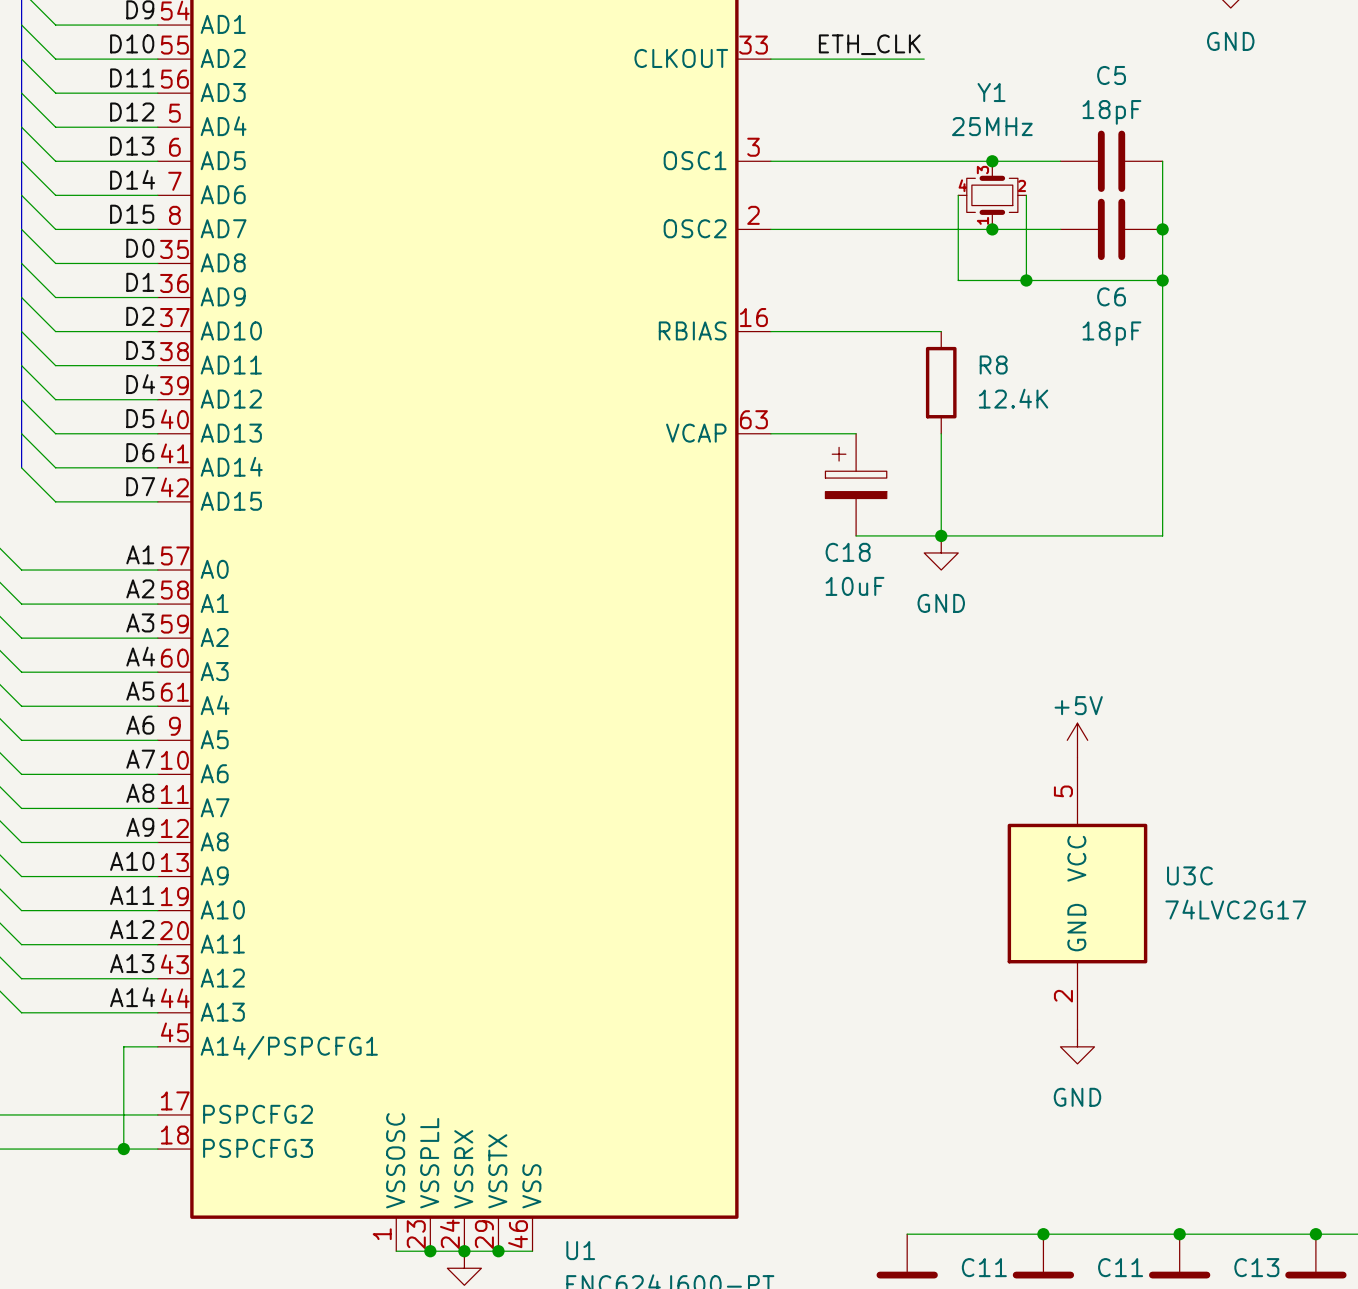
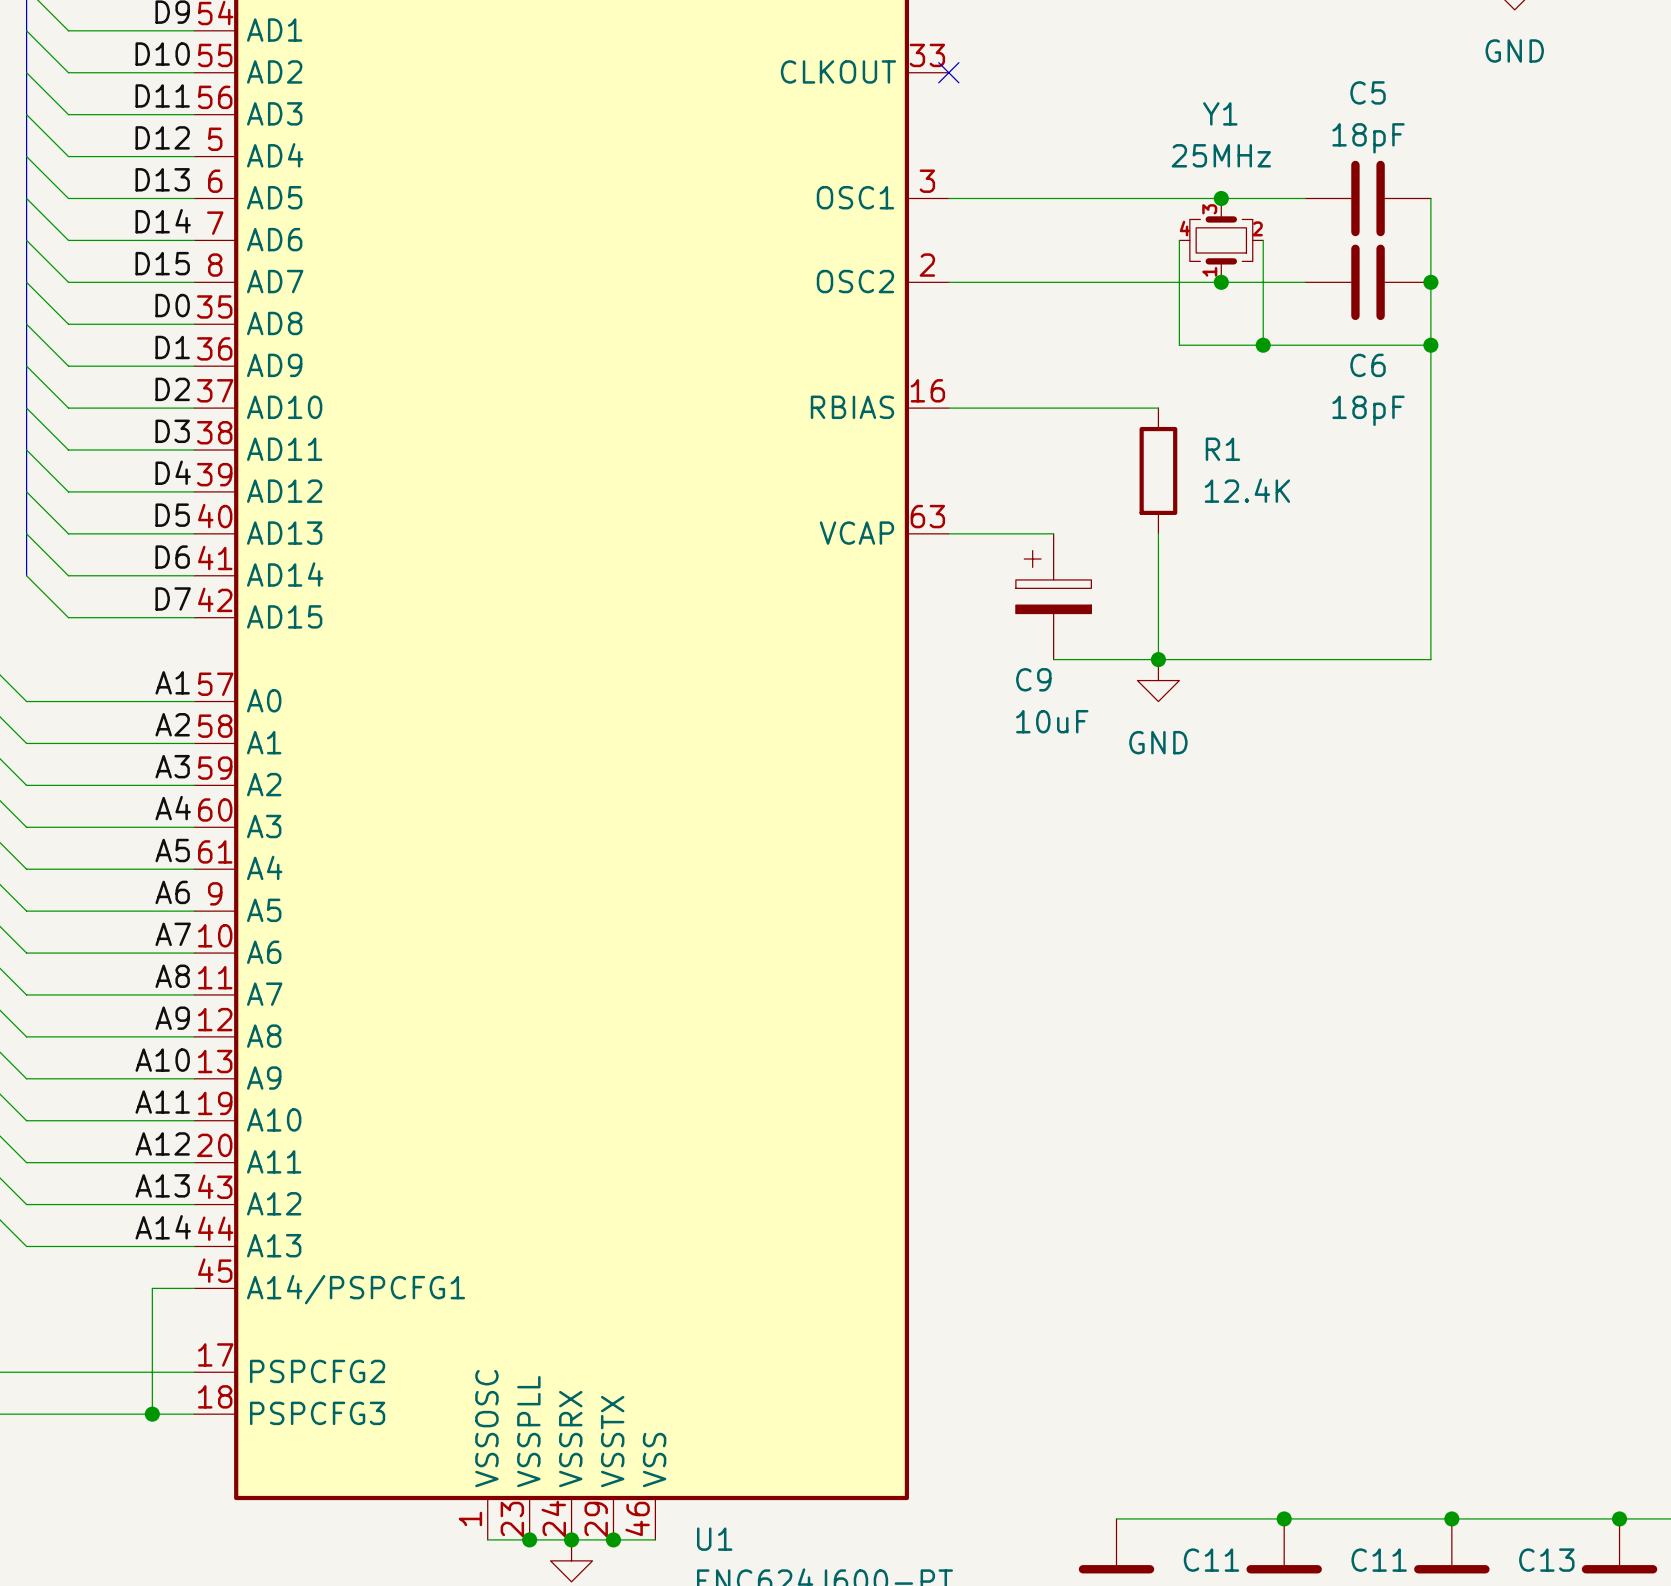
label: ETH_CLK (869, 44) -> none
wire: (770, 59) (924, 59) -> none
no-connect mark: none -> (948, 72)
R8 name: R8 (993, 365) -> R1 (1222, 449)
C18 name: C18 (848, 552) -> C9 (1033, 679)
power symbol: +5V (1077, 740) -> none
U3C: 74LVC2G17 (1077, 893) -> none
power symbol: GND (1077, 1046) -> none

